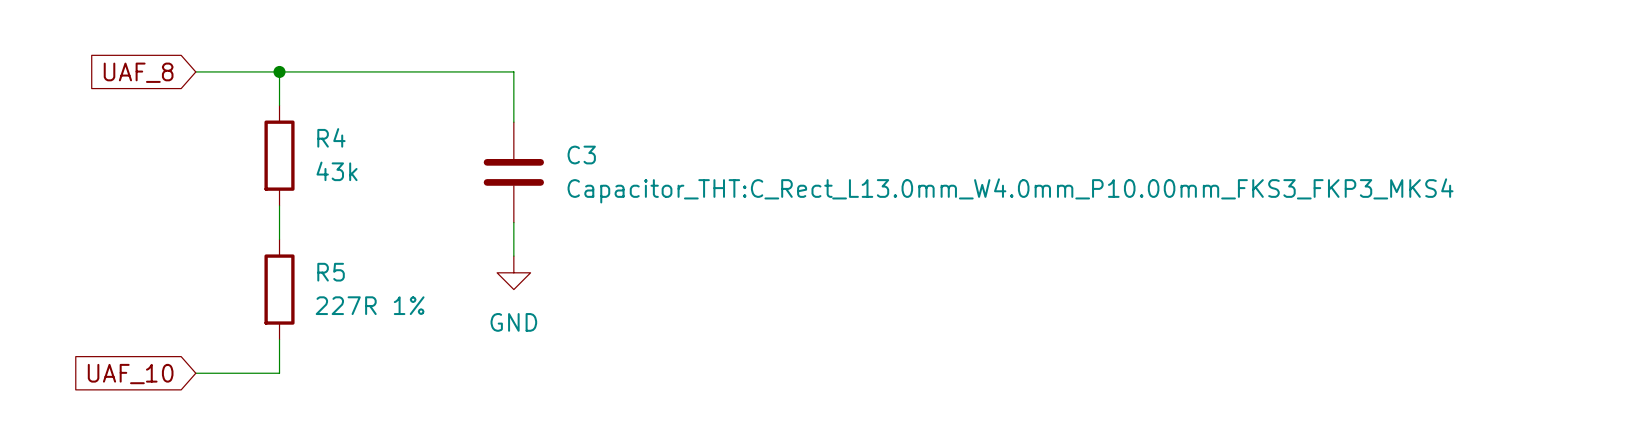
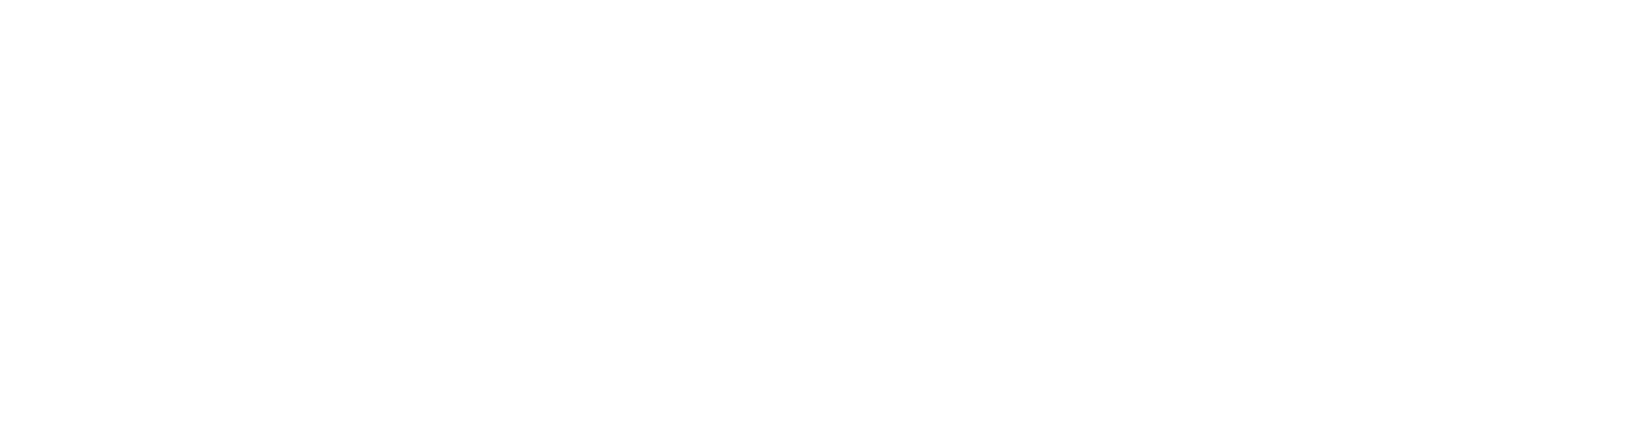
wire: (195, 71) (513, 71) (513, 122) -> none
wire: (279, 71) (279, 105) -> none
junction: (279, 71) -> none
global label: UAF_8 (138, 72) -> none
R4: 43k (279, 155) -> none
C3: Capacitor_THT:C_Rect_L13.0mm_W4.0mm_P10.00mm_FKS3_FKP3_MKS4 (513, 172) -> none
wire: (279, 205) (279, 239) -> none
wire: (513, 222) (513, 256) -> none
power symbol: GND (513, 272) -> none
R5: 227R 1% (279, 289) -> none
wire: (279, 339) (279, 373) (195, 373) -> none
global label: UAF_10 (130, 374) -> none

